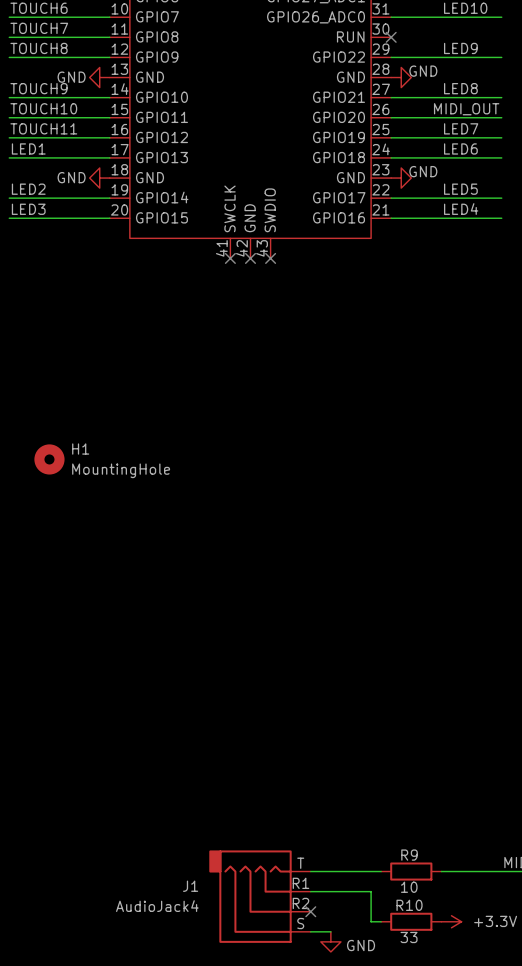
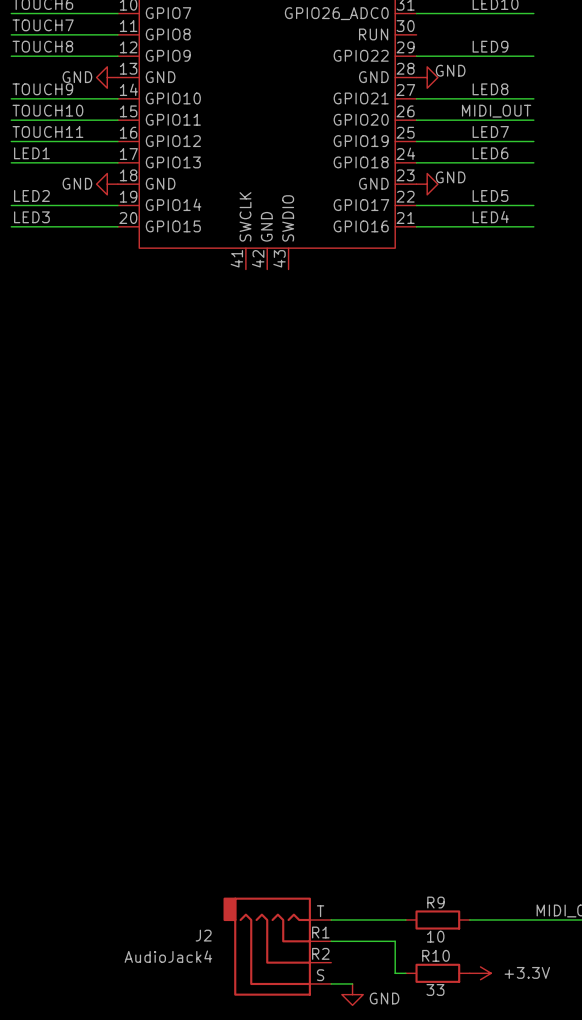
no-connect mark: (391, 37) -> none
no-connect mark: (230, 258) -> none
no-connect mark: (250, 258) -> none
no-connect mark: (270, 258) -> none
H1: MountingHole (49, 459) -> none
J1 name: J1 (190, 886) -> J2 (203, 935)
no-connect mark: (310, 911) -> none

